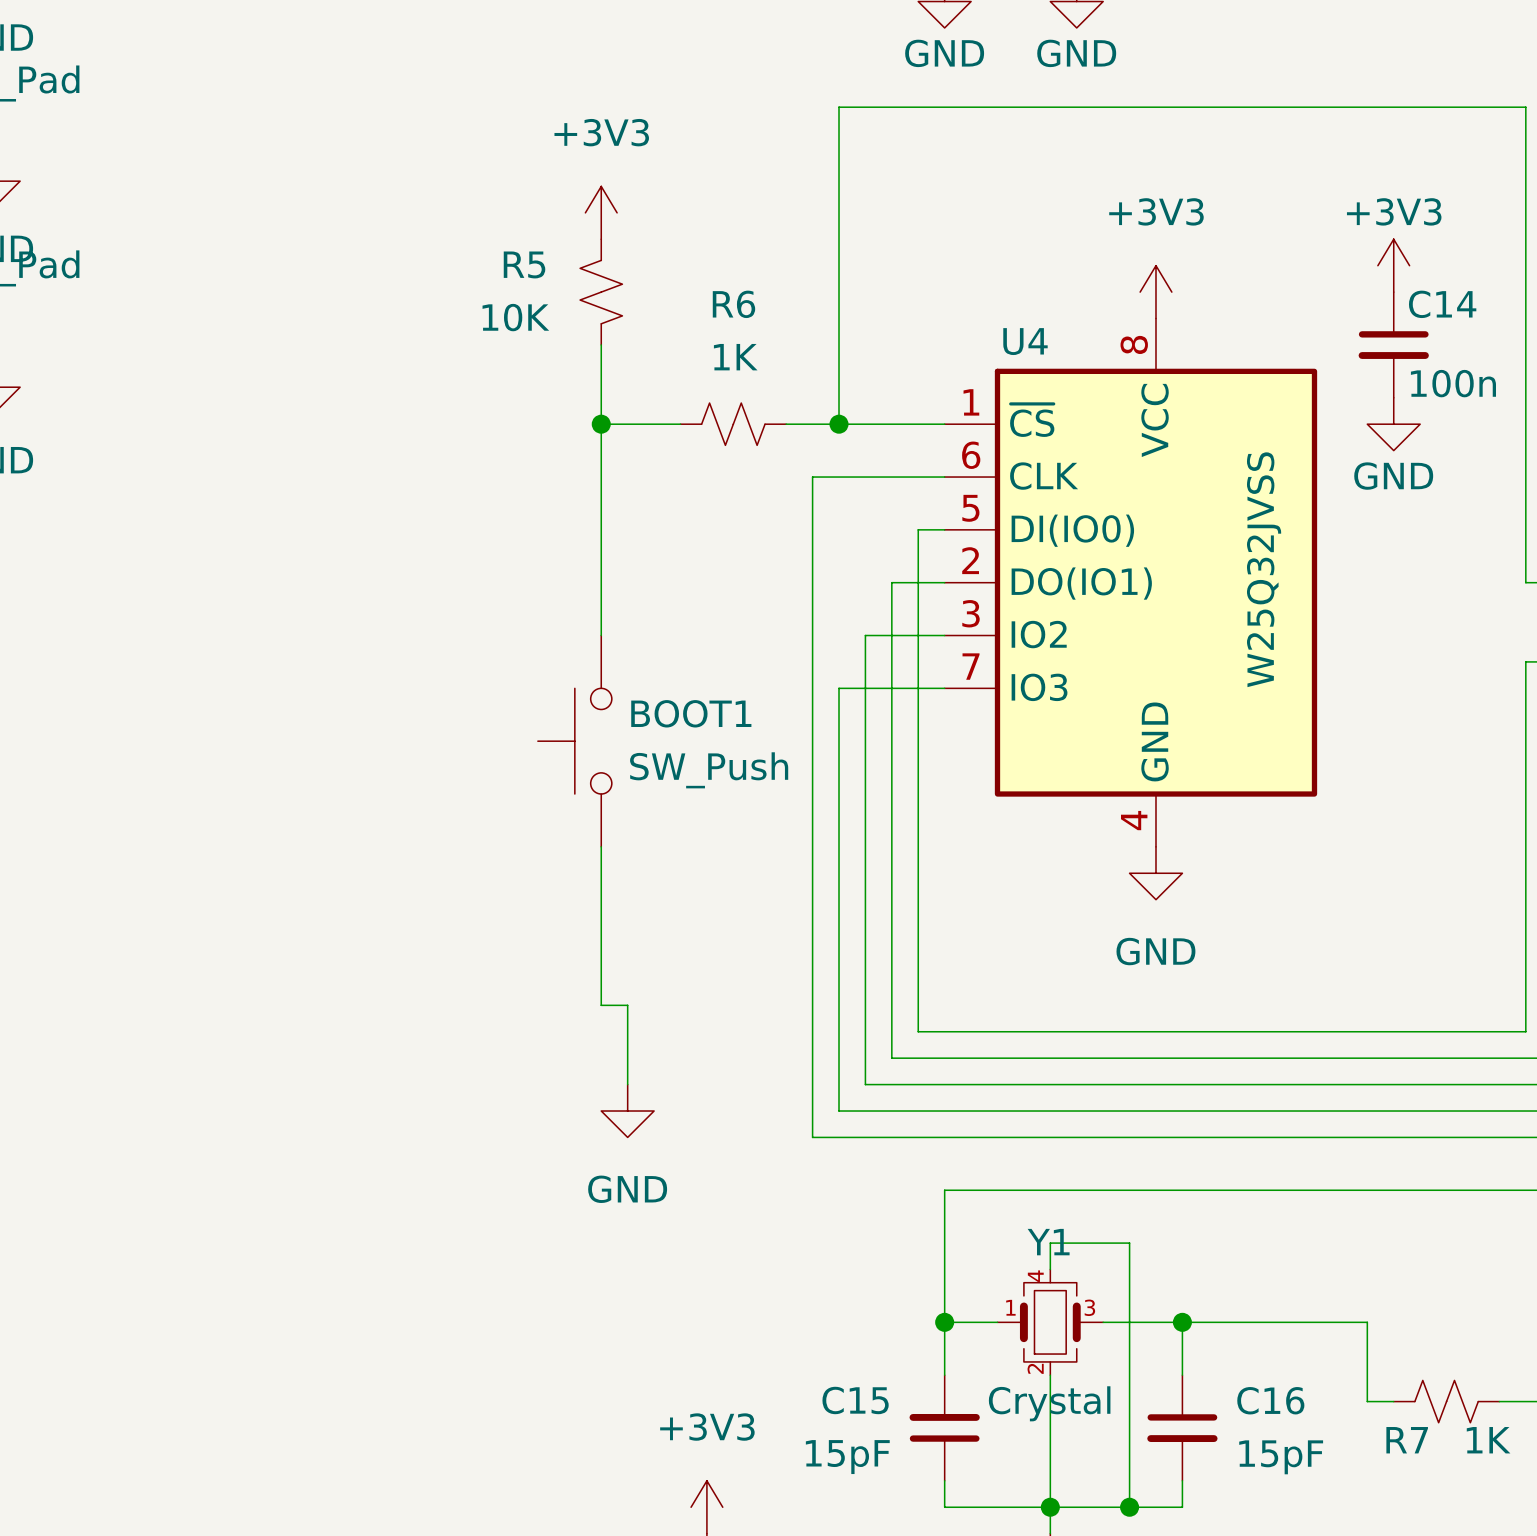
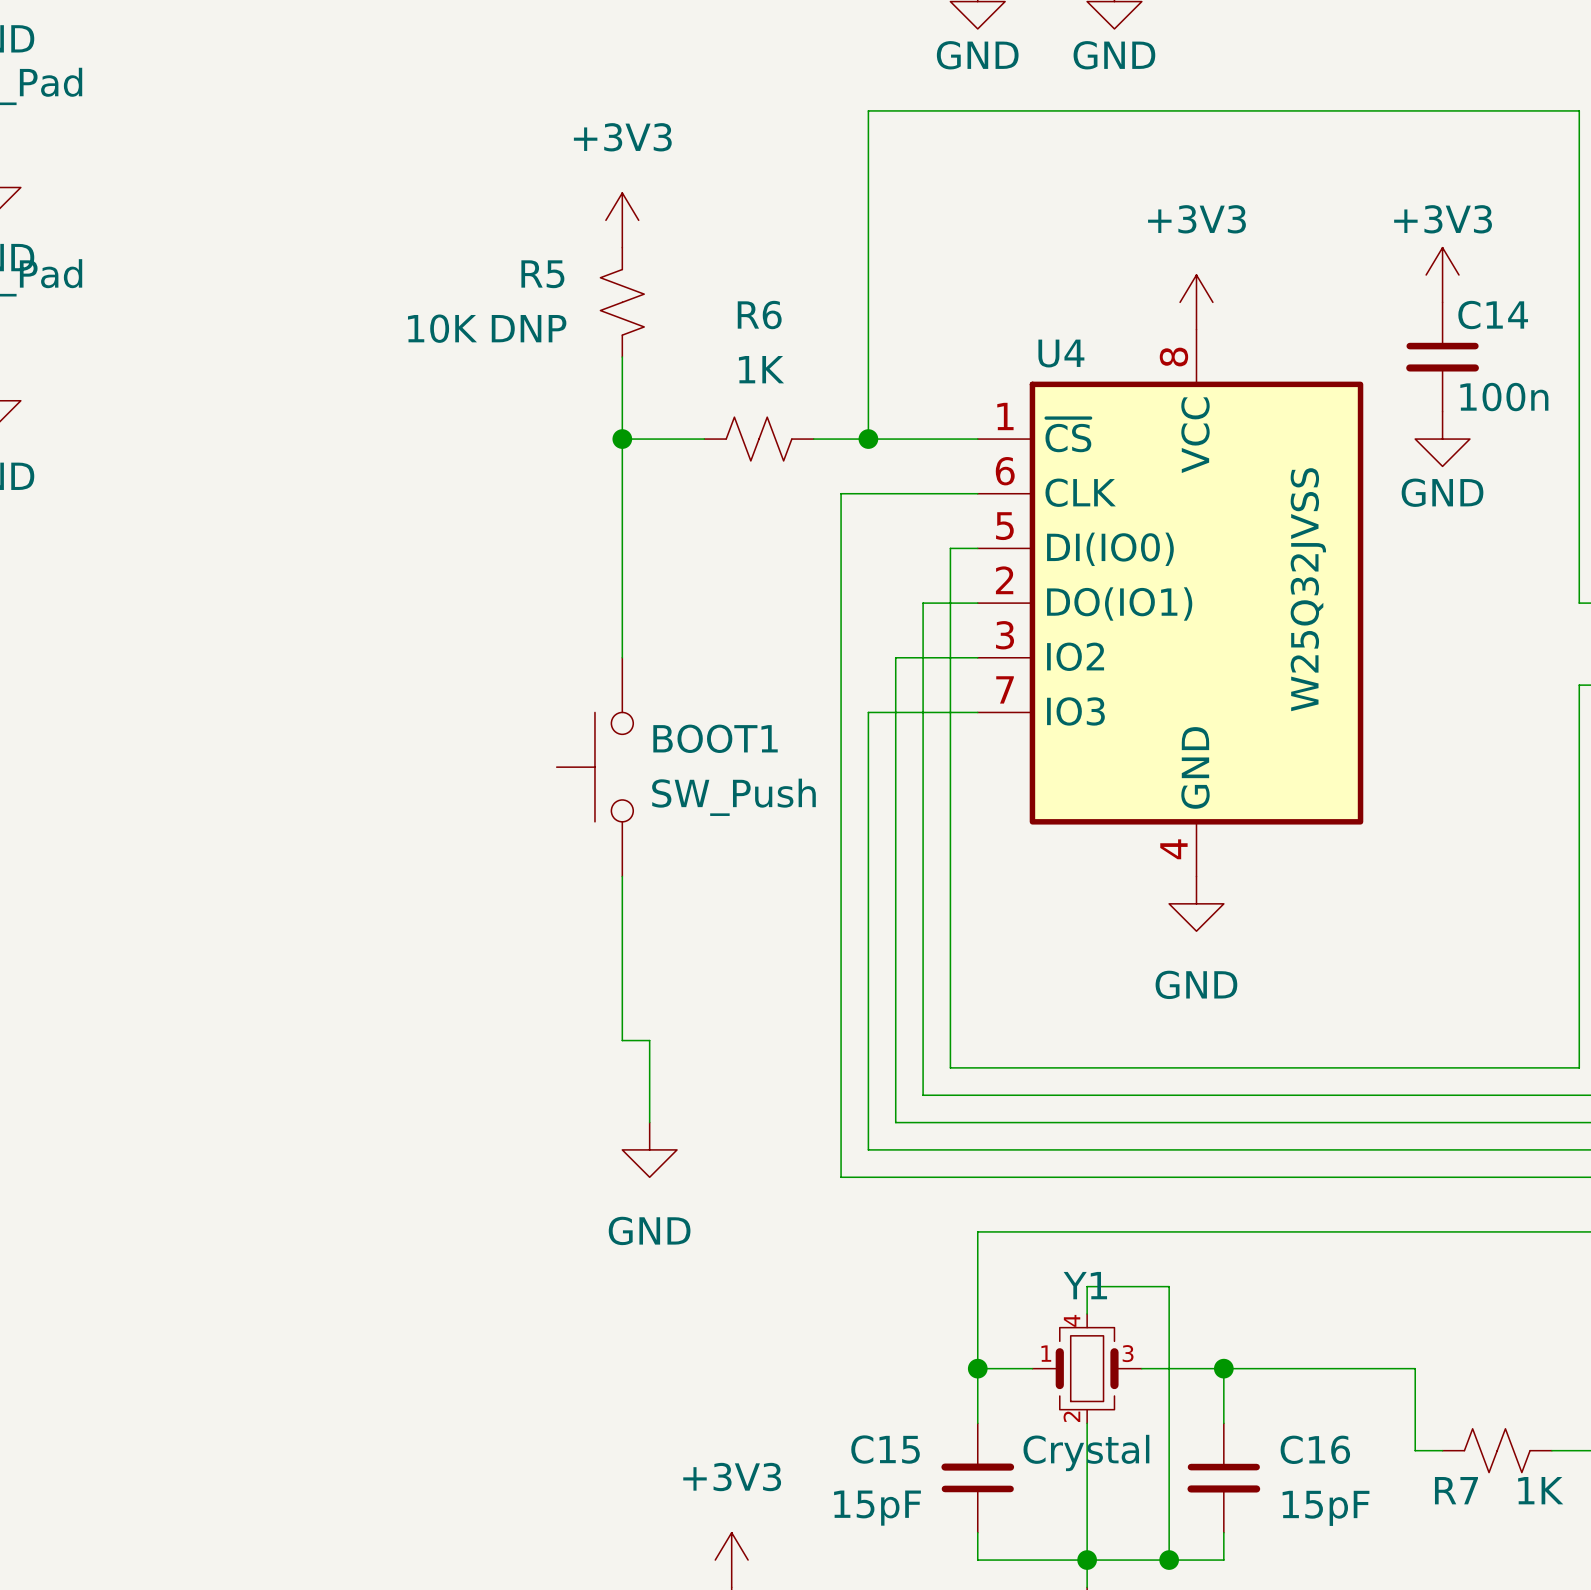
R5 value: 10K (515, 317) -> 10K DNP (487, 328)

